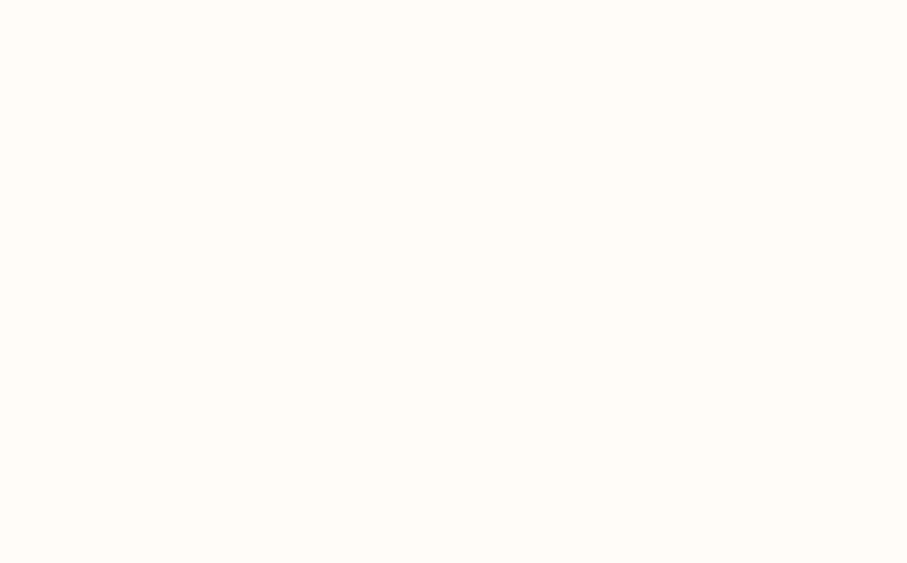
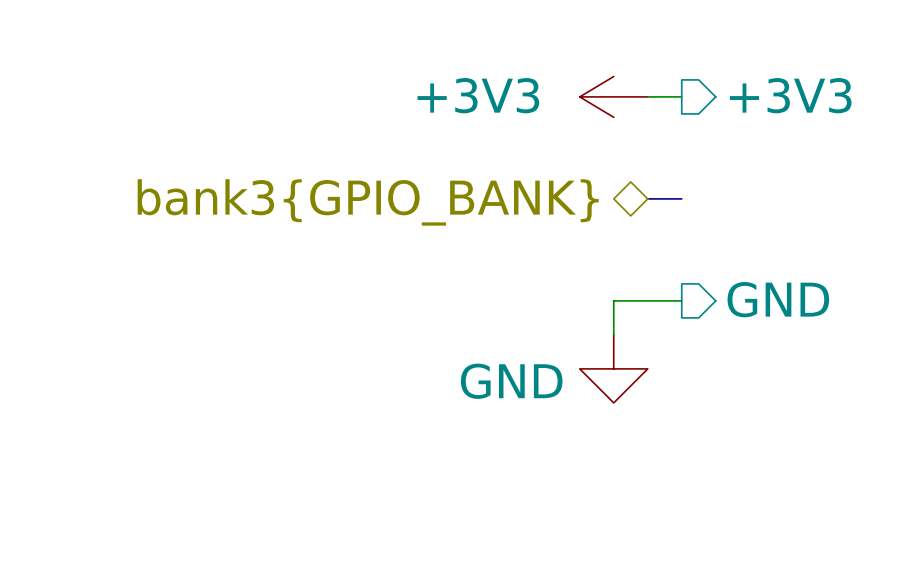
sheet pin: none -> +3V3 (790, 95)
power symbol: none -> +3V3 (613, 96)
wire: none -> (647, 96) (681, 96)
bus: none -> (647, 198) (681, 198)
hierarchical label: none -> bank3{GPIO_BANK} (368, 202)
sheet pin: none -> GND (778, 299)
wire: none -> (681, 300) (613, 300) (613, 334)
power symbol: none -> GND (613, 368)

